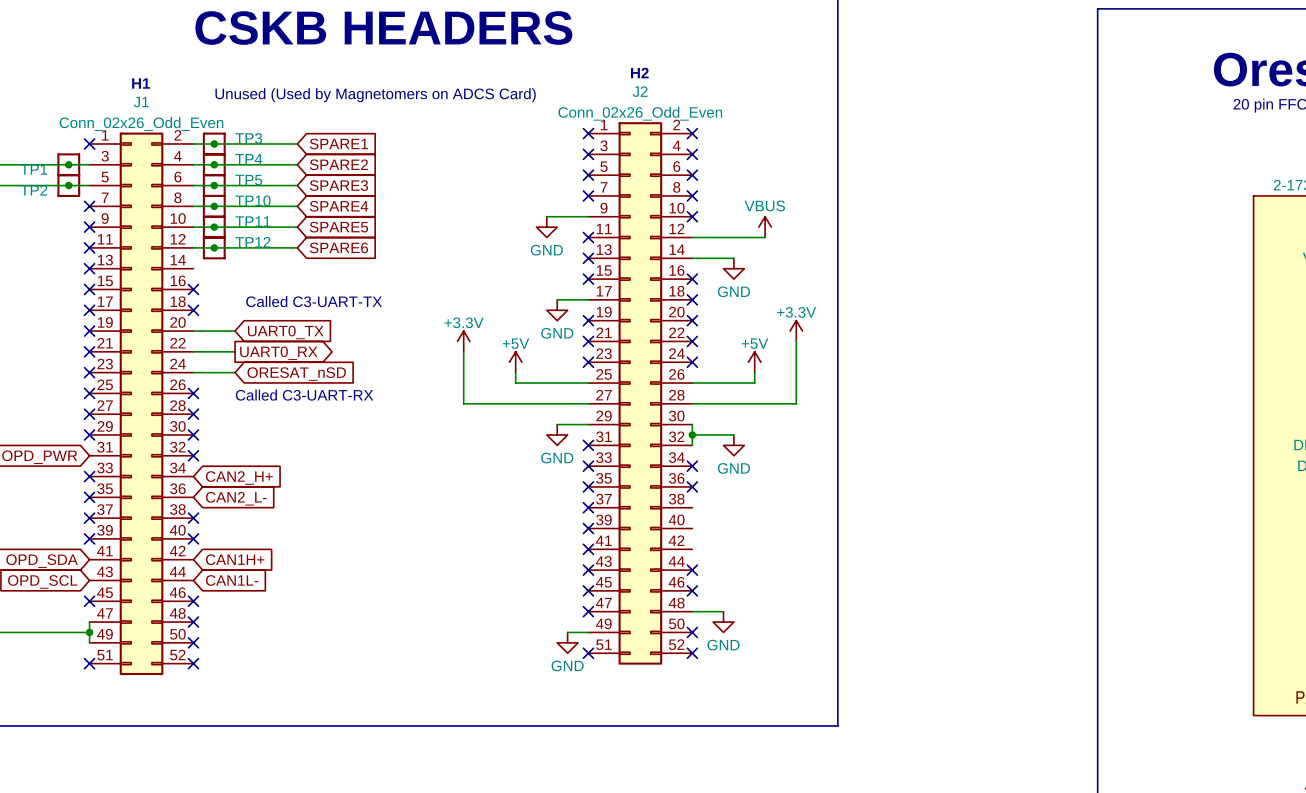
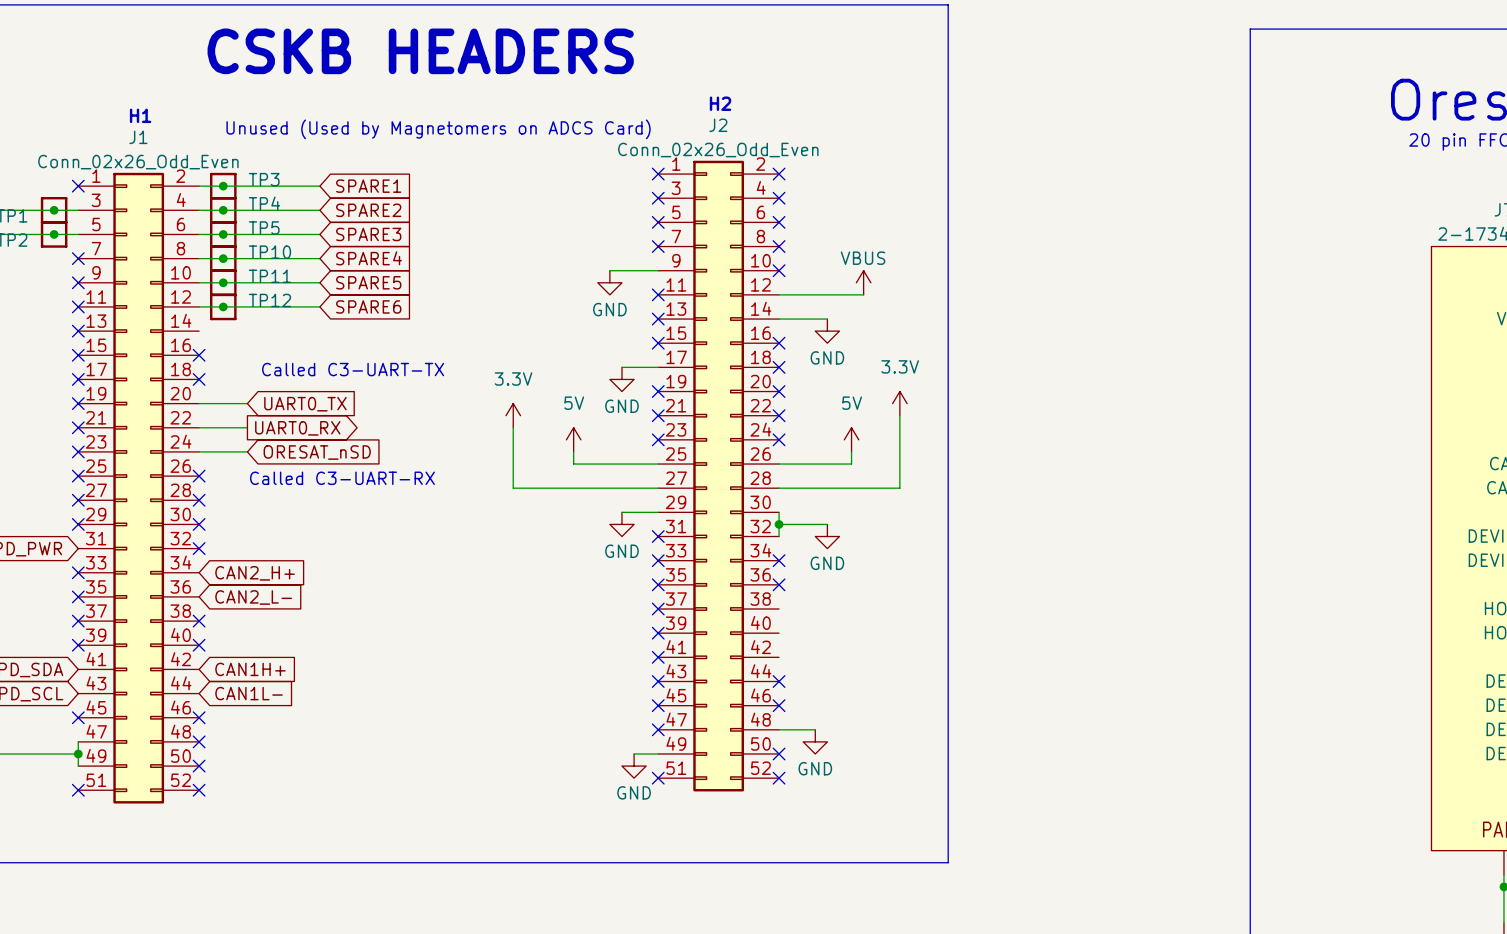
power symbol: +3.3V (796, 331) -> 3.3V (899, 403)
power symbol: +3.3V (463, 341) -> 3.3V (513, 415)
power symbol: +5V (515, 362) -> 5V (573, 439)
power symbol: +5V (754, 362) -> 5V (851, 439)

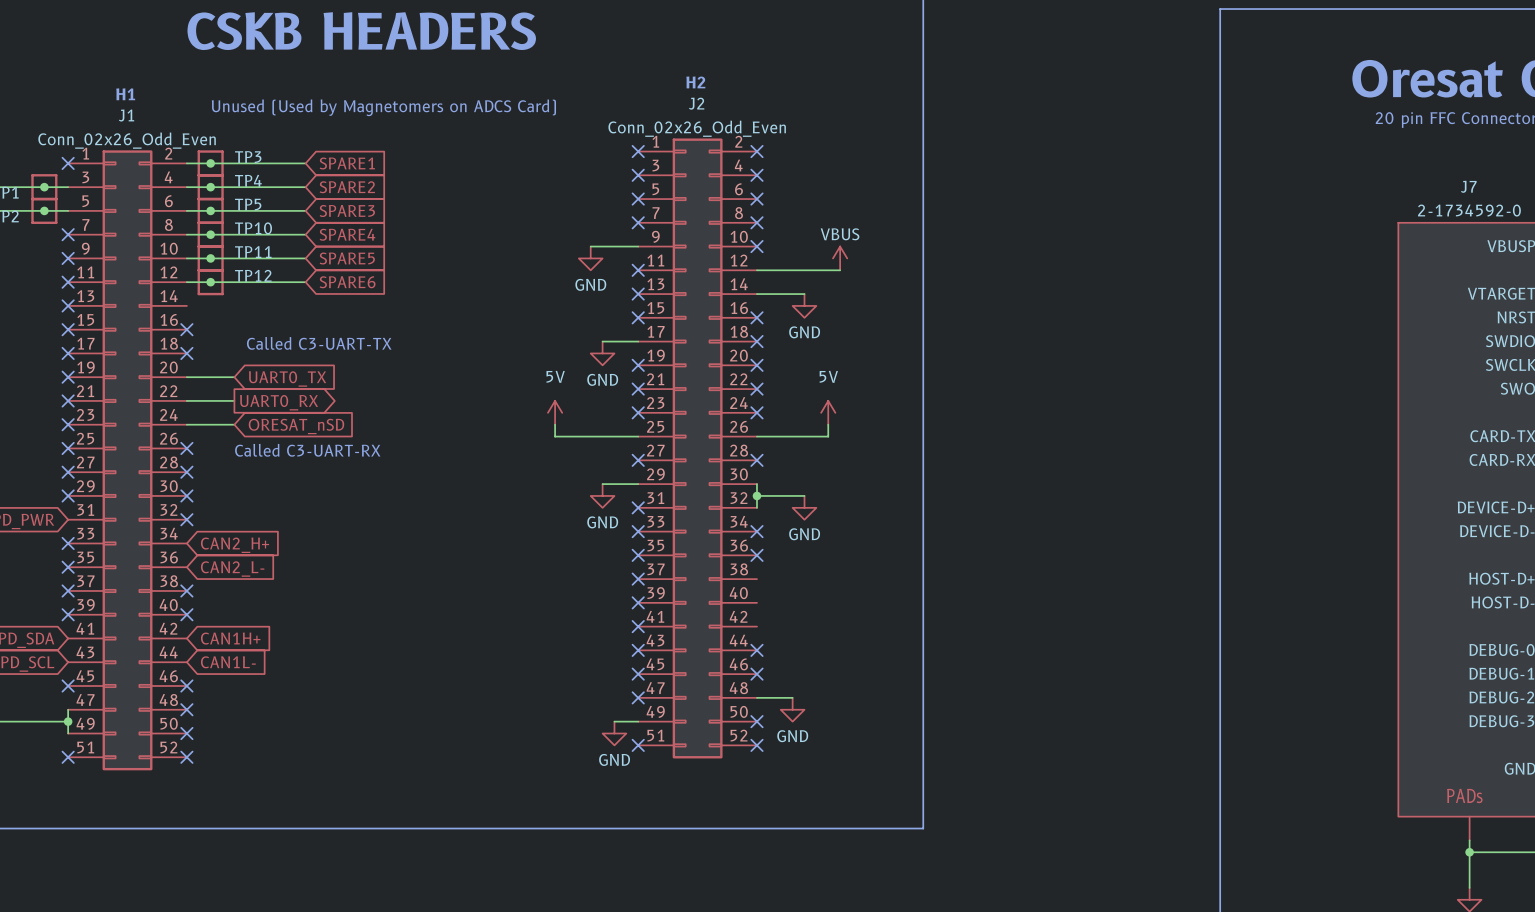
power symbol: 3.3V (899, 403) -> none
power symbol: 3.3V (513, 415) -> none
wire: (899, 415) (899, 488) (779, 488) -> none
wire: (513, 427) (513, 488) (658, 488) -> none
no-connect mark: none -> (638, 460)
no-connect mark: none -> (756, 460)

